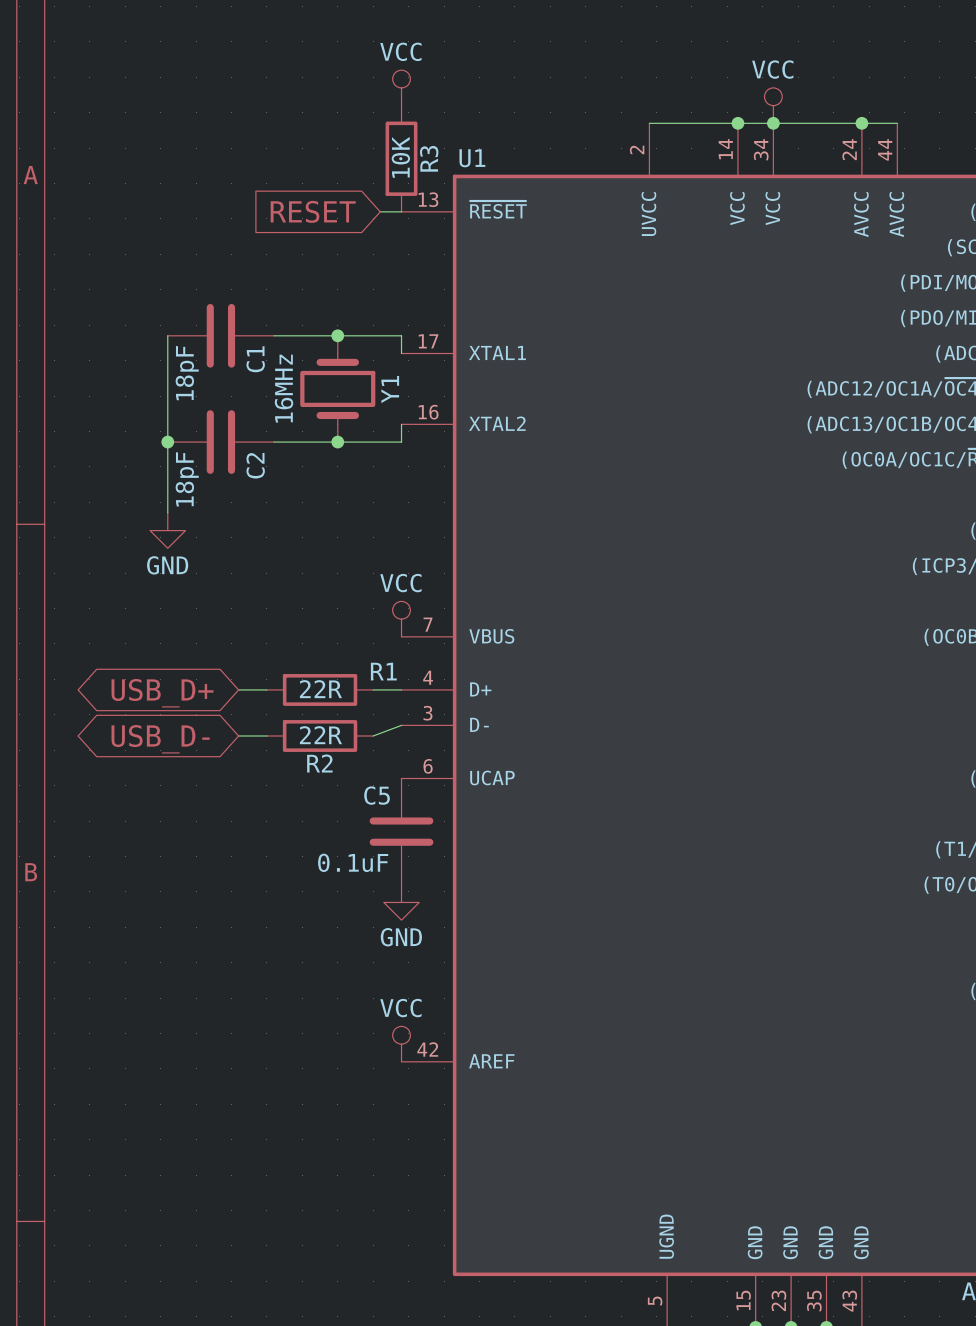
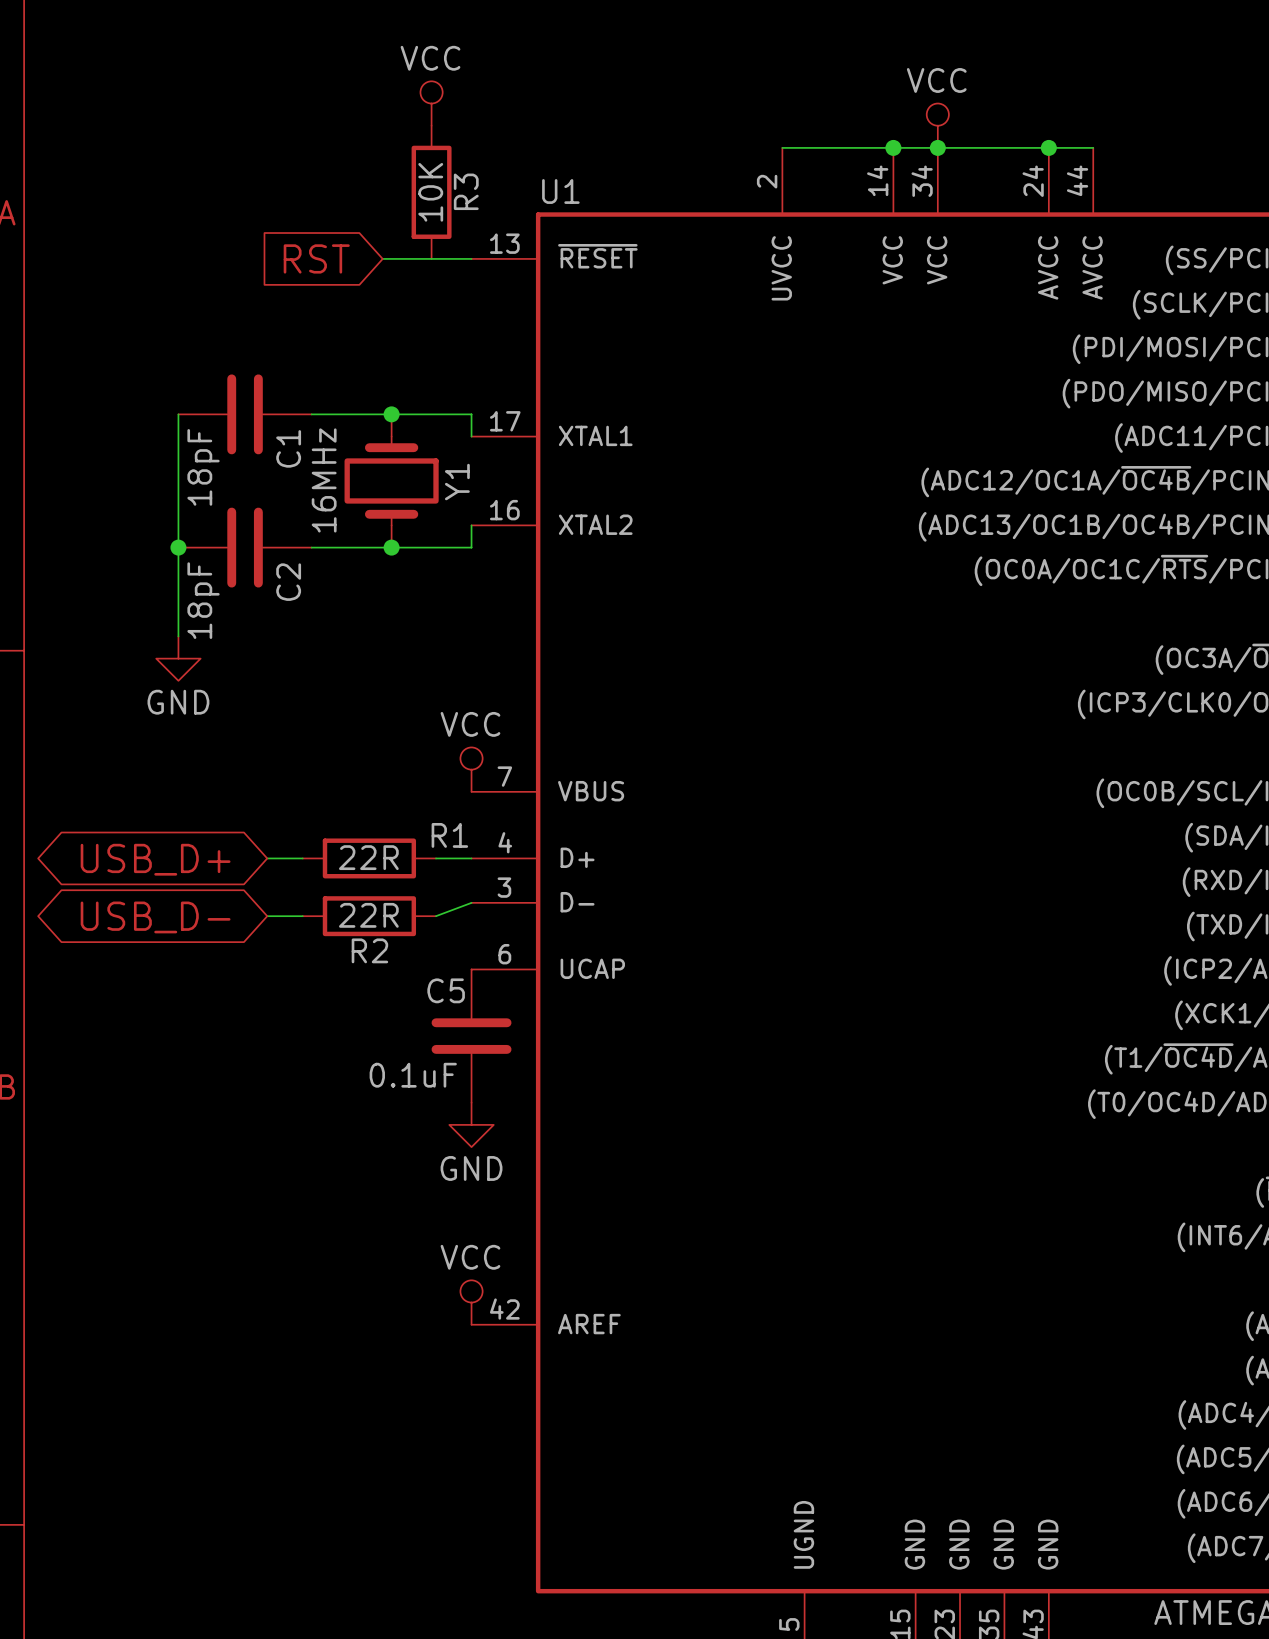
power symbol position: VCC (401, 87) -> VCC (431, 103)
R3 position: (401, 158) -> (431, 192)
global label: RESET (313, 211) -> RST (316, 258)
wire: none -> (382, 258) (444, 258)

